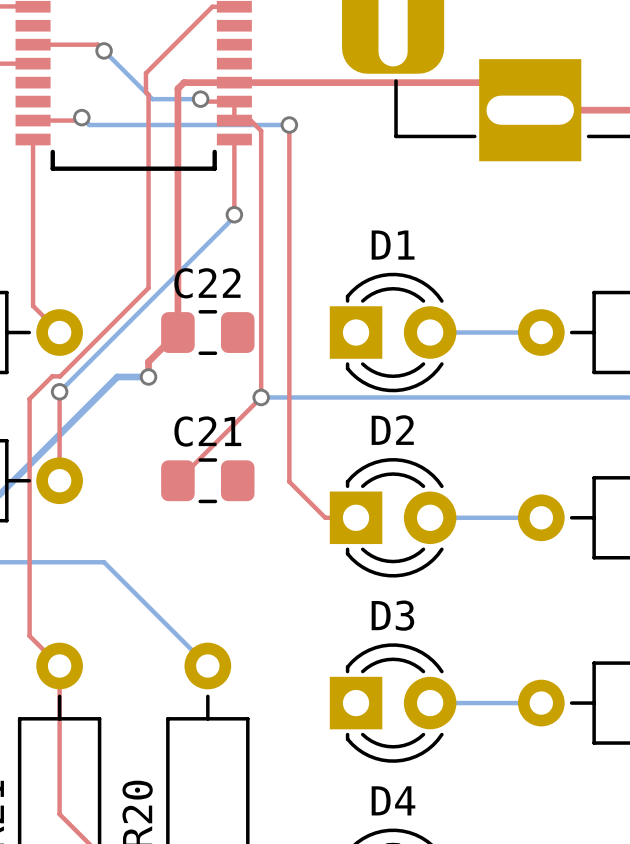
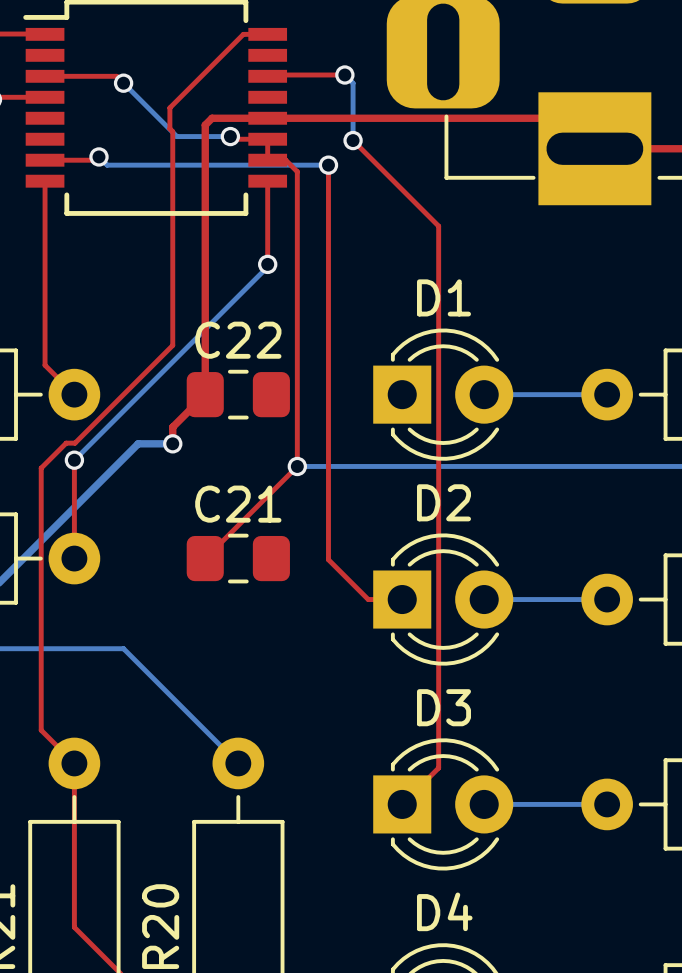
top track: none -> (344, 74) (267, 76)
bottom track: none -> (344, 74) (353, 83) (353, 140)
via: none -> (344, 74)
top track: none -> (353, 140) (438, 226) (438, 768) (402, 804)
via: none -> (353, 140)

